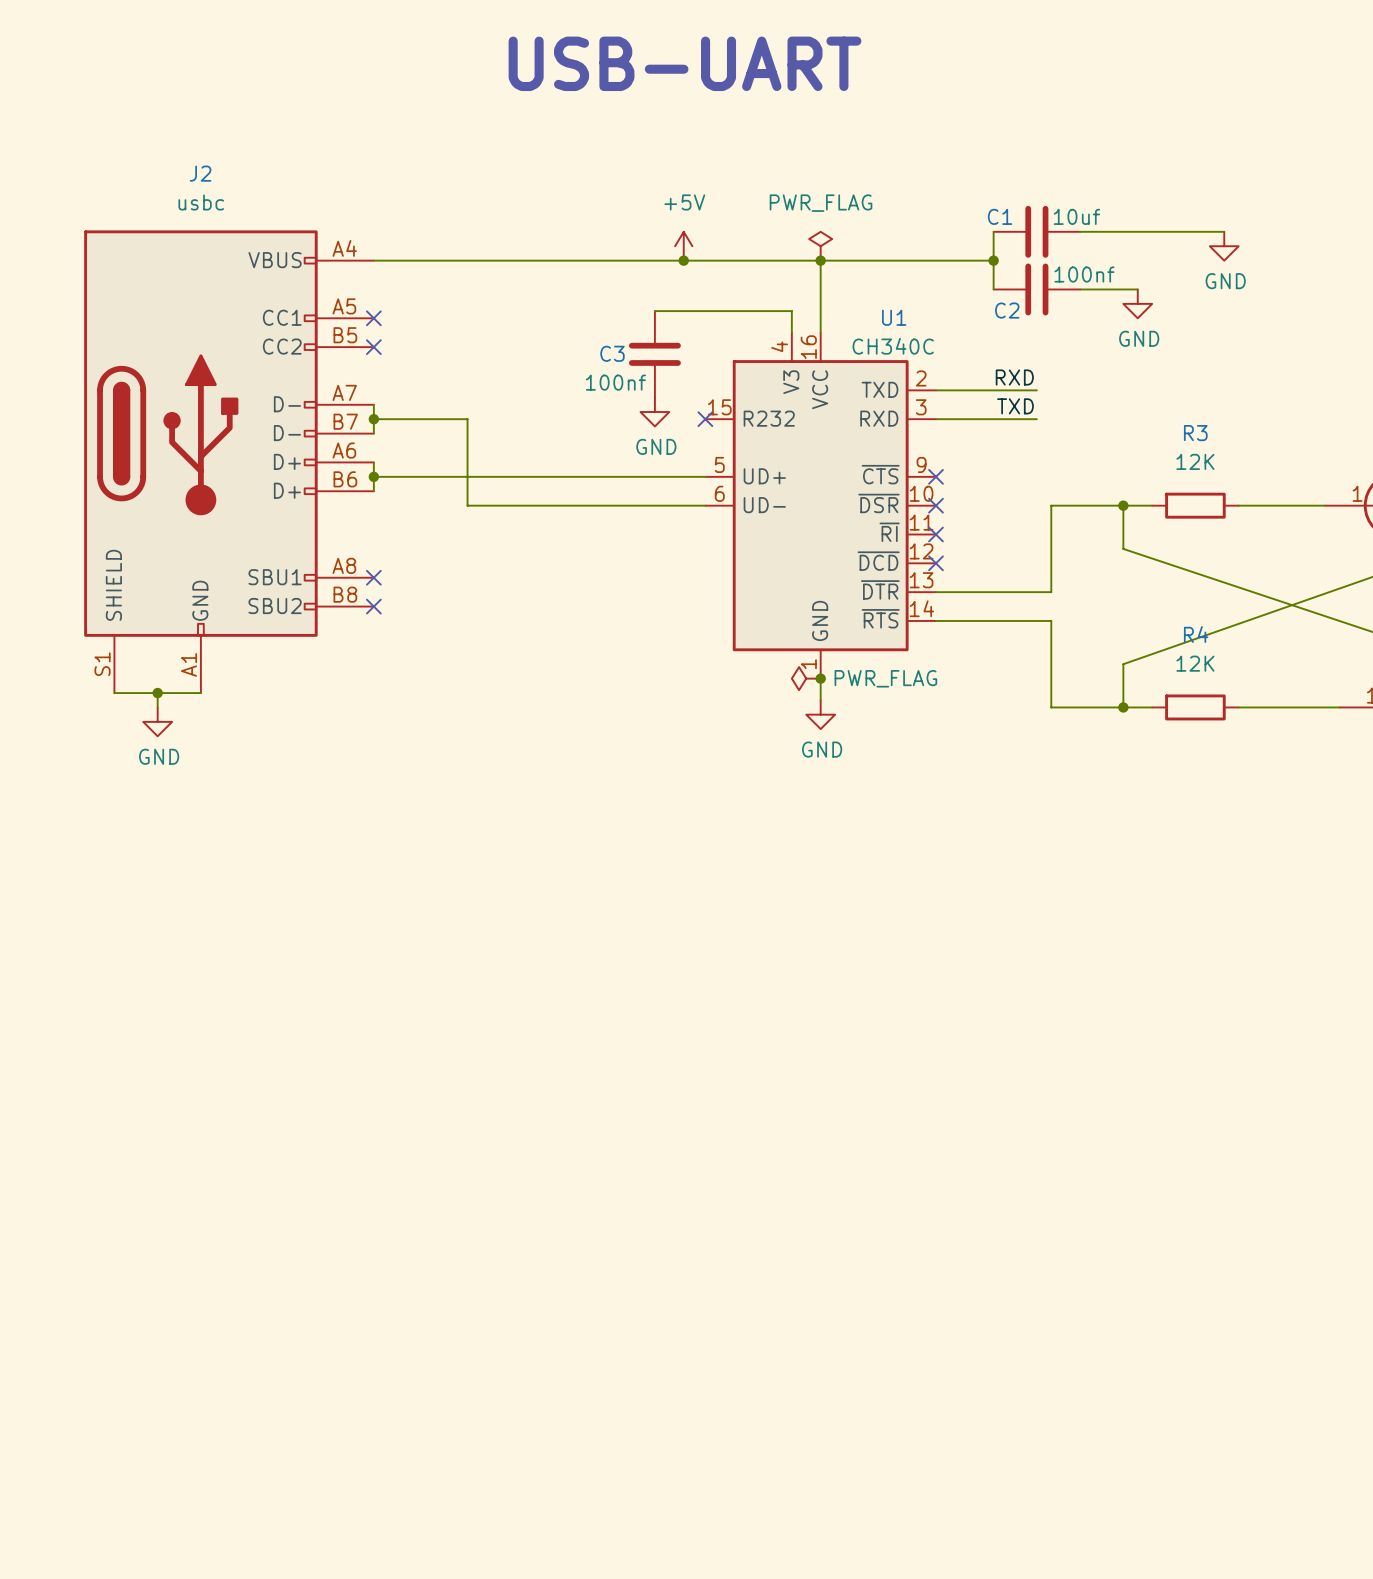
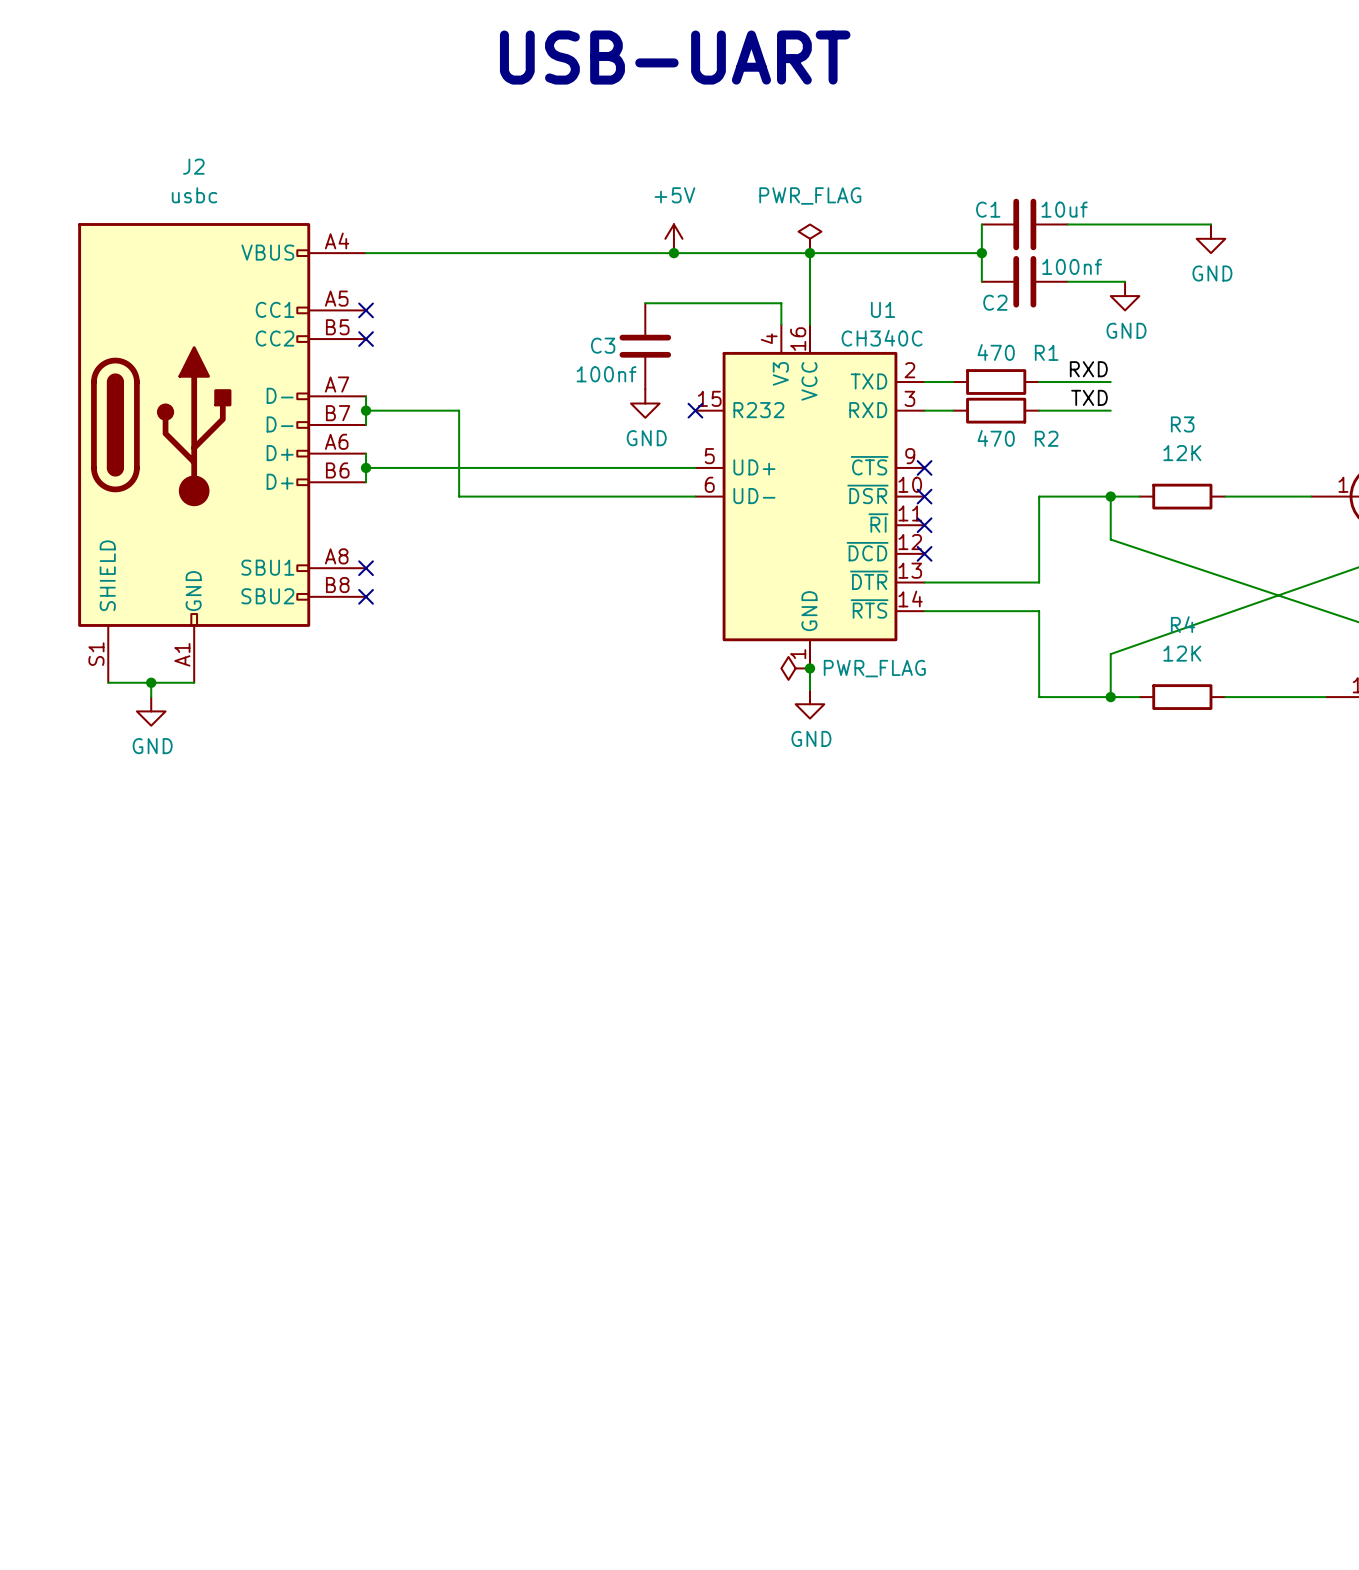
label position: RXD (1014, 377) -> RXD (1088, 369)
wire: (964, 390) (1036, 390) -> (1039, 382) (1110, 382)
R1: none -> 470 (996, 382)
label position: TXD (1015, 406) -> TXD (1089, 397)
wire: (964, 419) (1036, 419) -> (1039, 410) (1110, 410)
R2: none -> 470 (996, 410)

